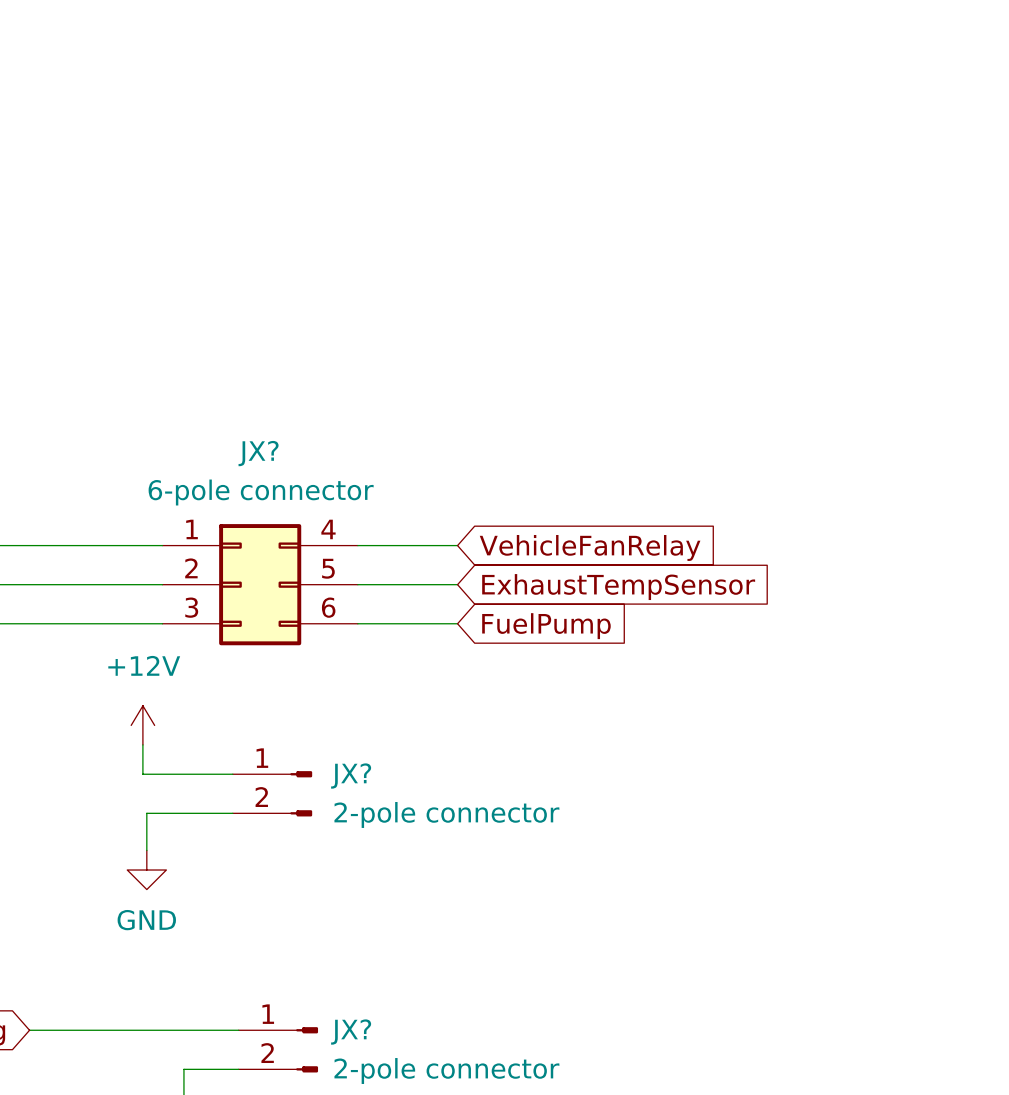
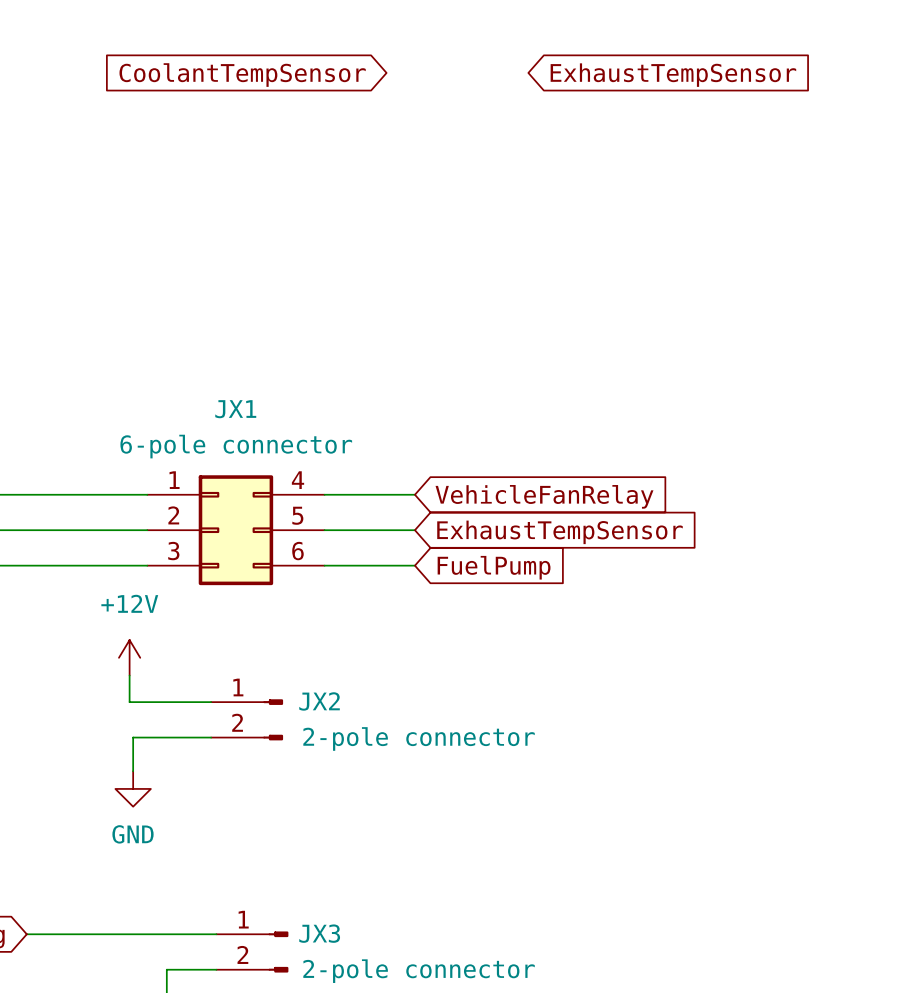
global label: none -> CoolantTempSensor (242, 75)
global label: none -> ExhaustTempSensor (673, 75)
JX? name: JX? (258, 453) -> JX1 (235, 409)
JX? name: JX? (351, 776) -> JX2 (319, 701)
JX? name: JX? (351, 1032) -> JX3 (319, 933)

